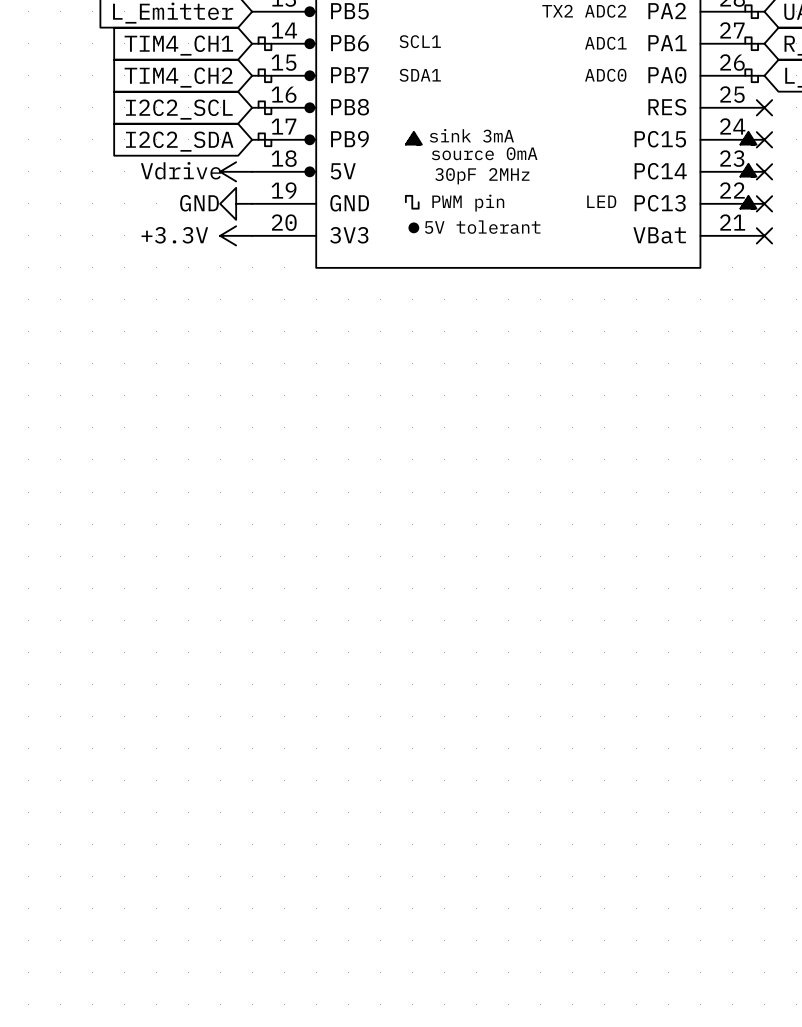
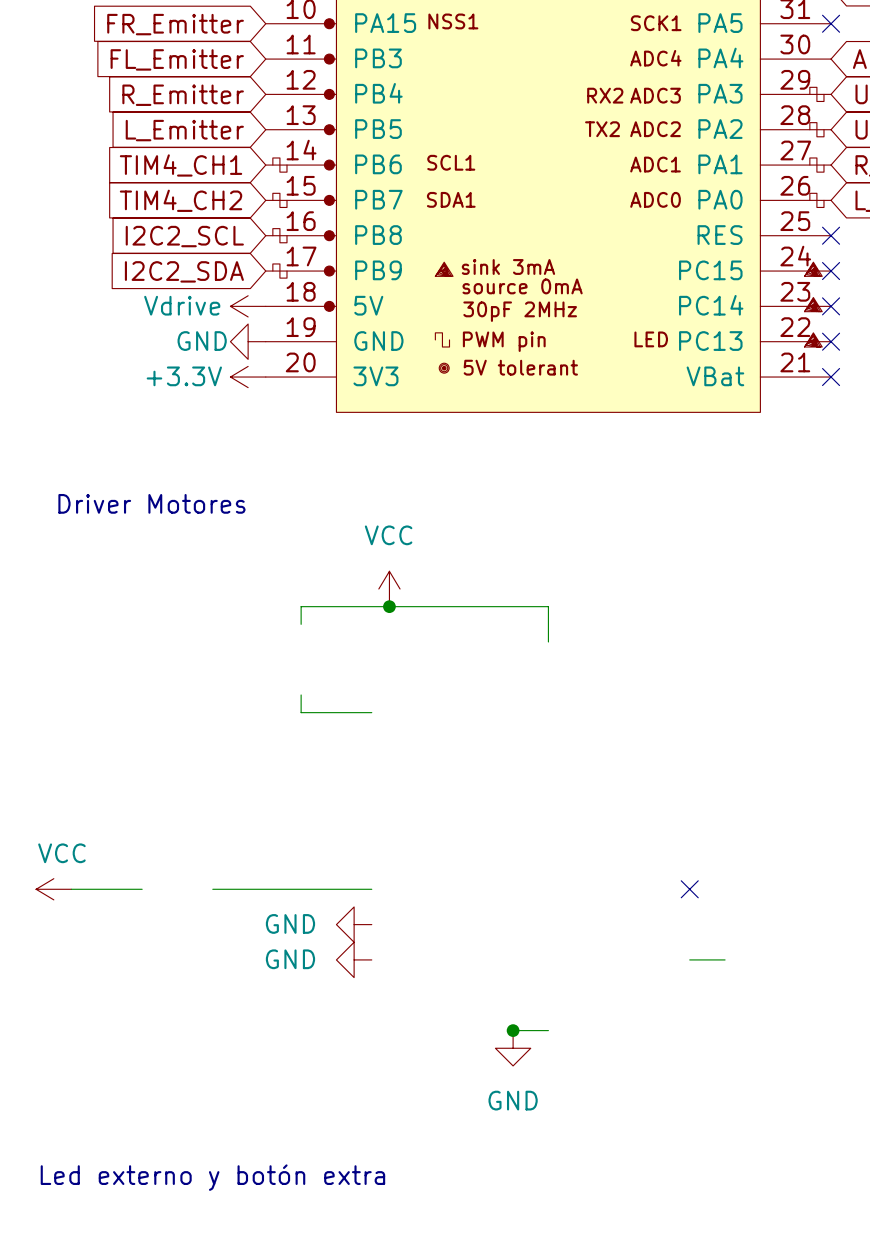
text: none -> Driver Motores (151, 503)
power symbol: none -> VCC (389, 588)
junction: none -> (389, 606)
wire: none -> (301, 624) (301, 606) (548, 606) (548, 641)
wire: none -> (301, 694) (301, 712) (371, 712)
power symbol: none -> VCC (53, 889)
wire: none -> (71, 889) (142, 889)
wire: none -> (212, 889) (371, 889)
no-connect mark: none -> (689, 889)
power symbol: none -> GND (354, 924)
power symbol: none -> GND (354, 959)
wire: none -> (689, 959) (725, 959)
wire: none -> (513, 1030) (548, 1030)
junction: none -> (513, 1030)
power symbol: none -> GND (513, 1048)
text: none -> Led externo y botón extra (212, 1177)

